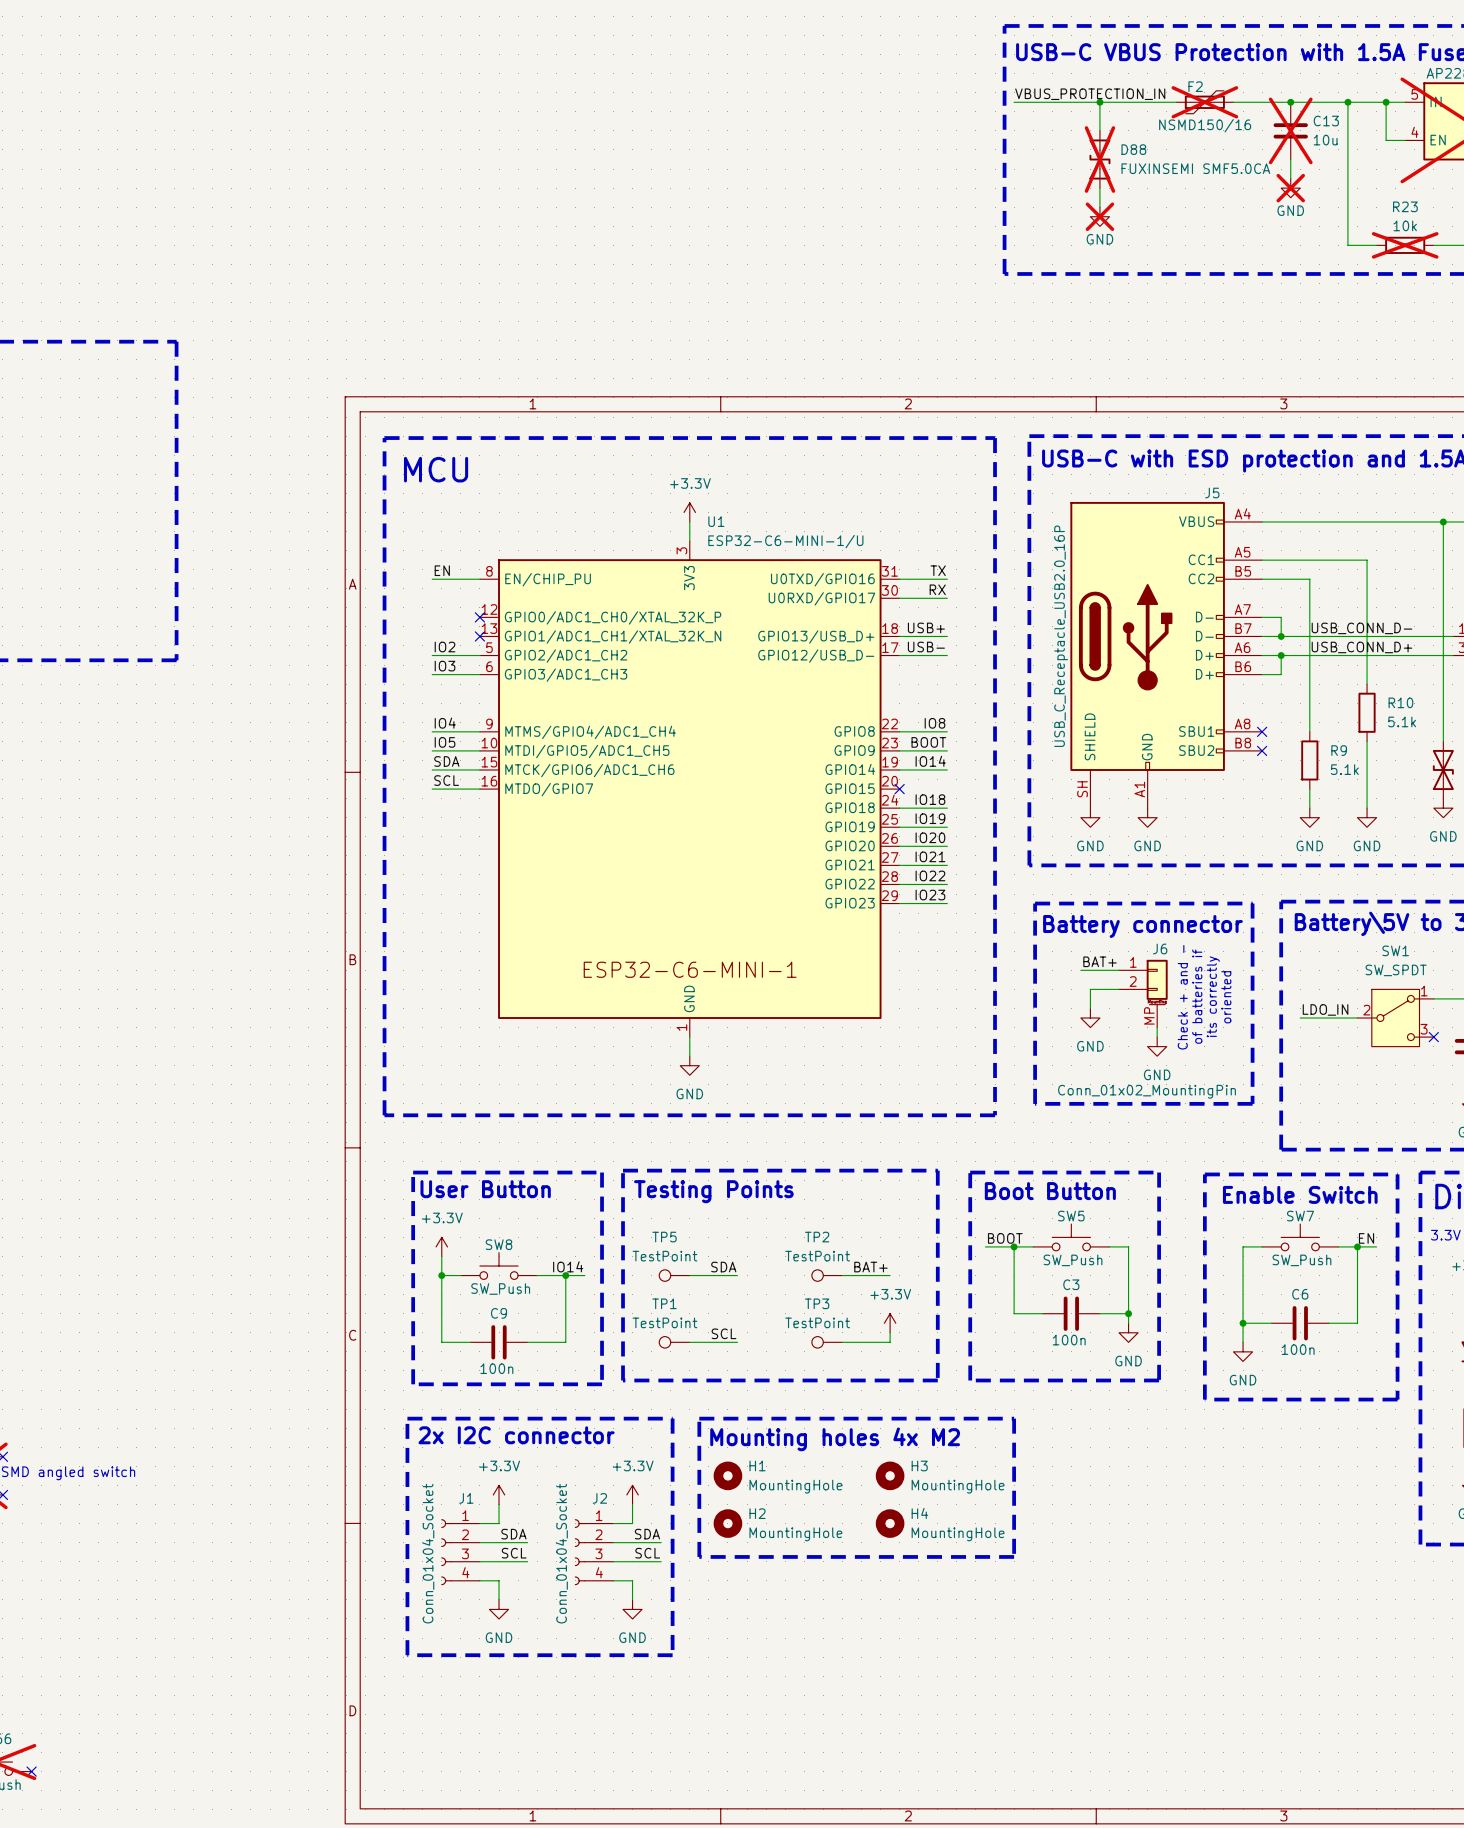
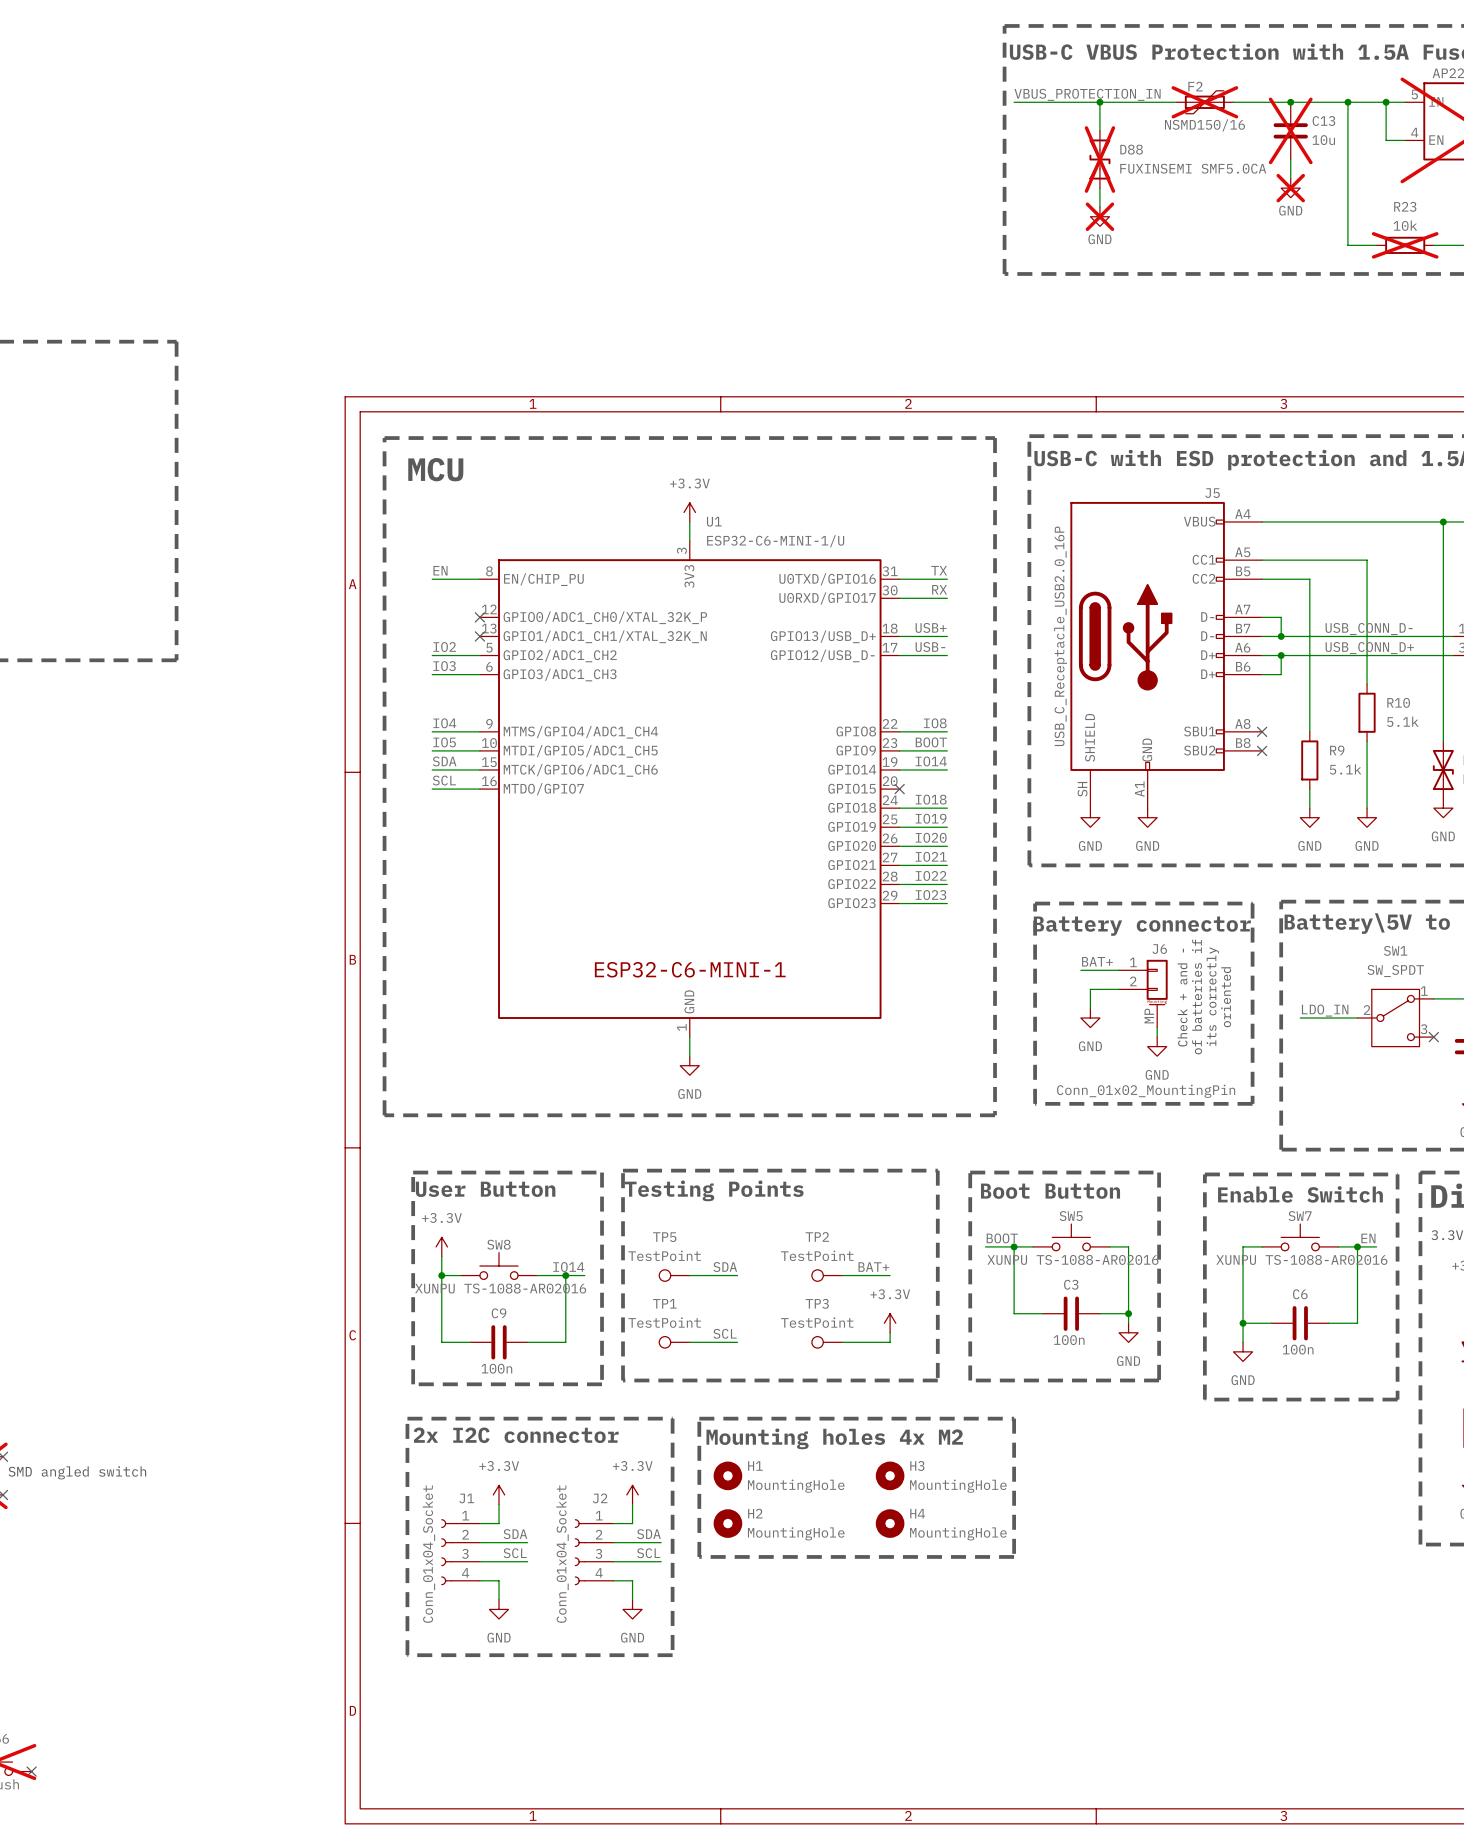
SW5 value: SW_Push (1073, 1260) -> XUNPU TS-1088-AR02016 (1072, 1259)
SW7 value: SW_Push (1301, 1260) -> XUNPU TS-1088-AR02016 (1301, 1259)
SW8 value: SW_Push (500, 1289) -> XUNPU TS-1088-AR02016 (500, 1288)

